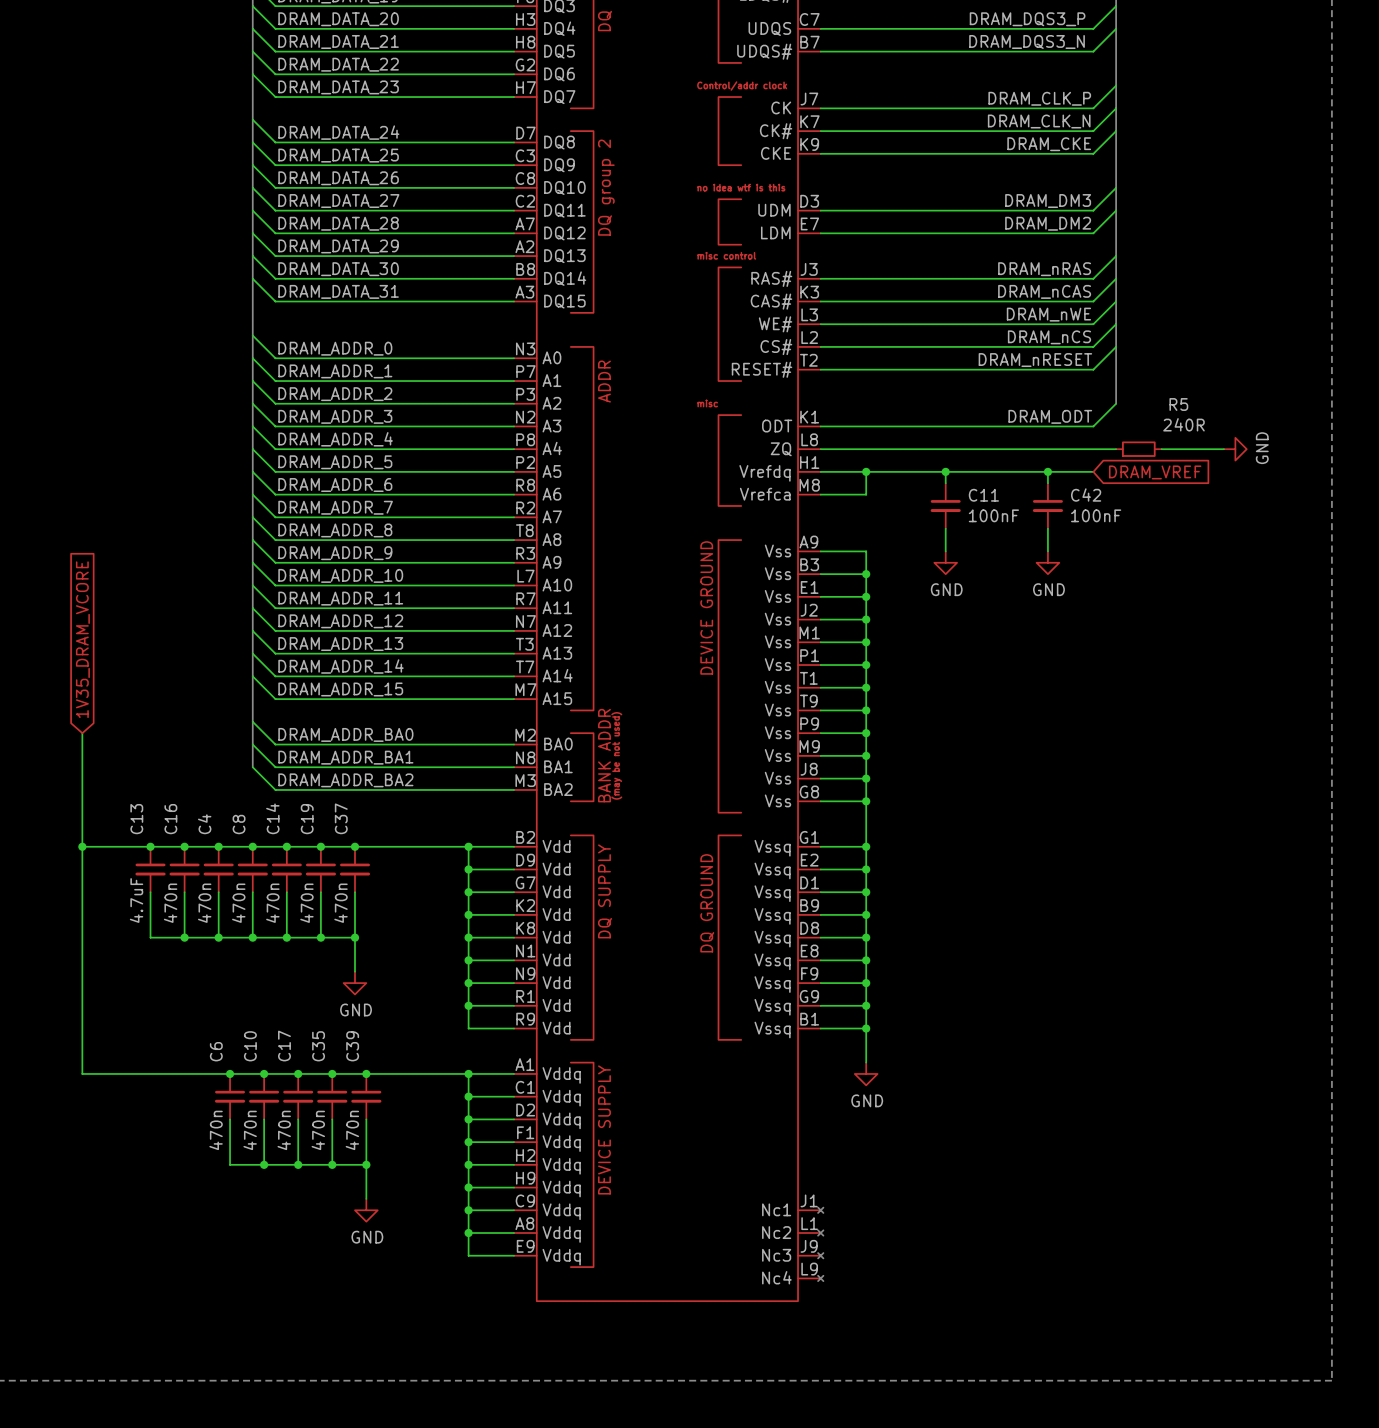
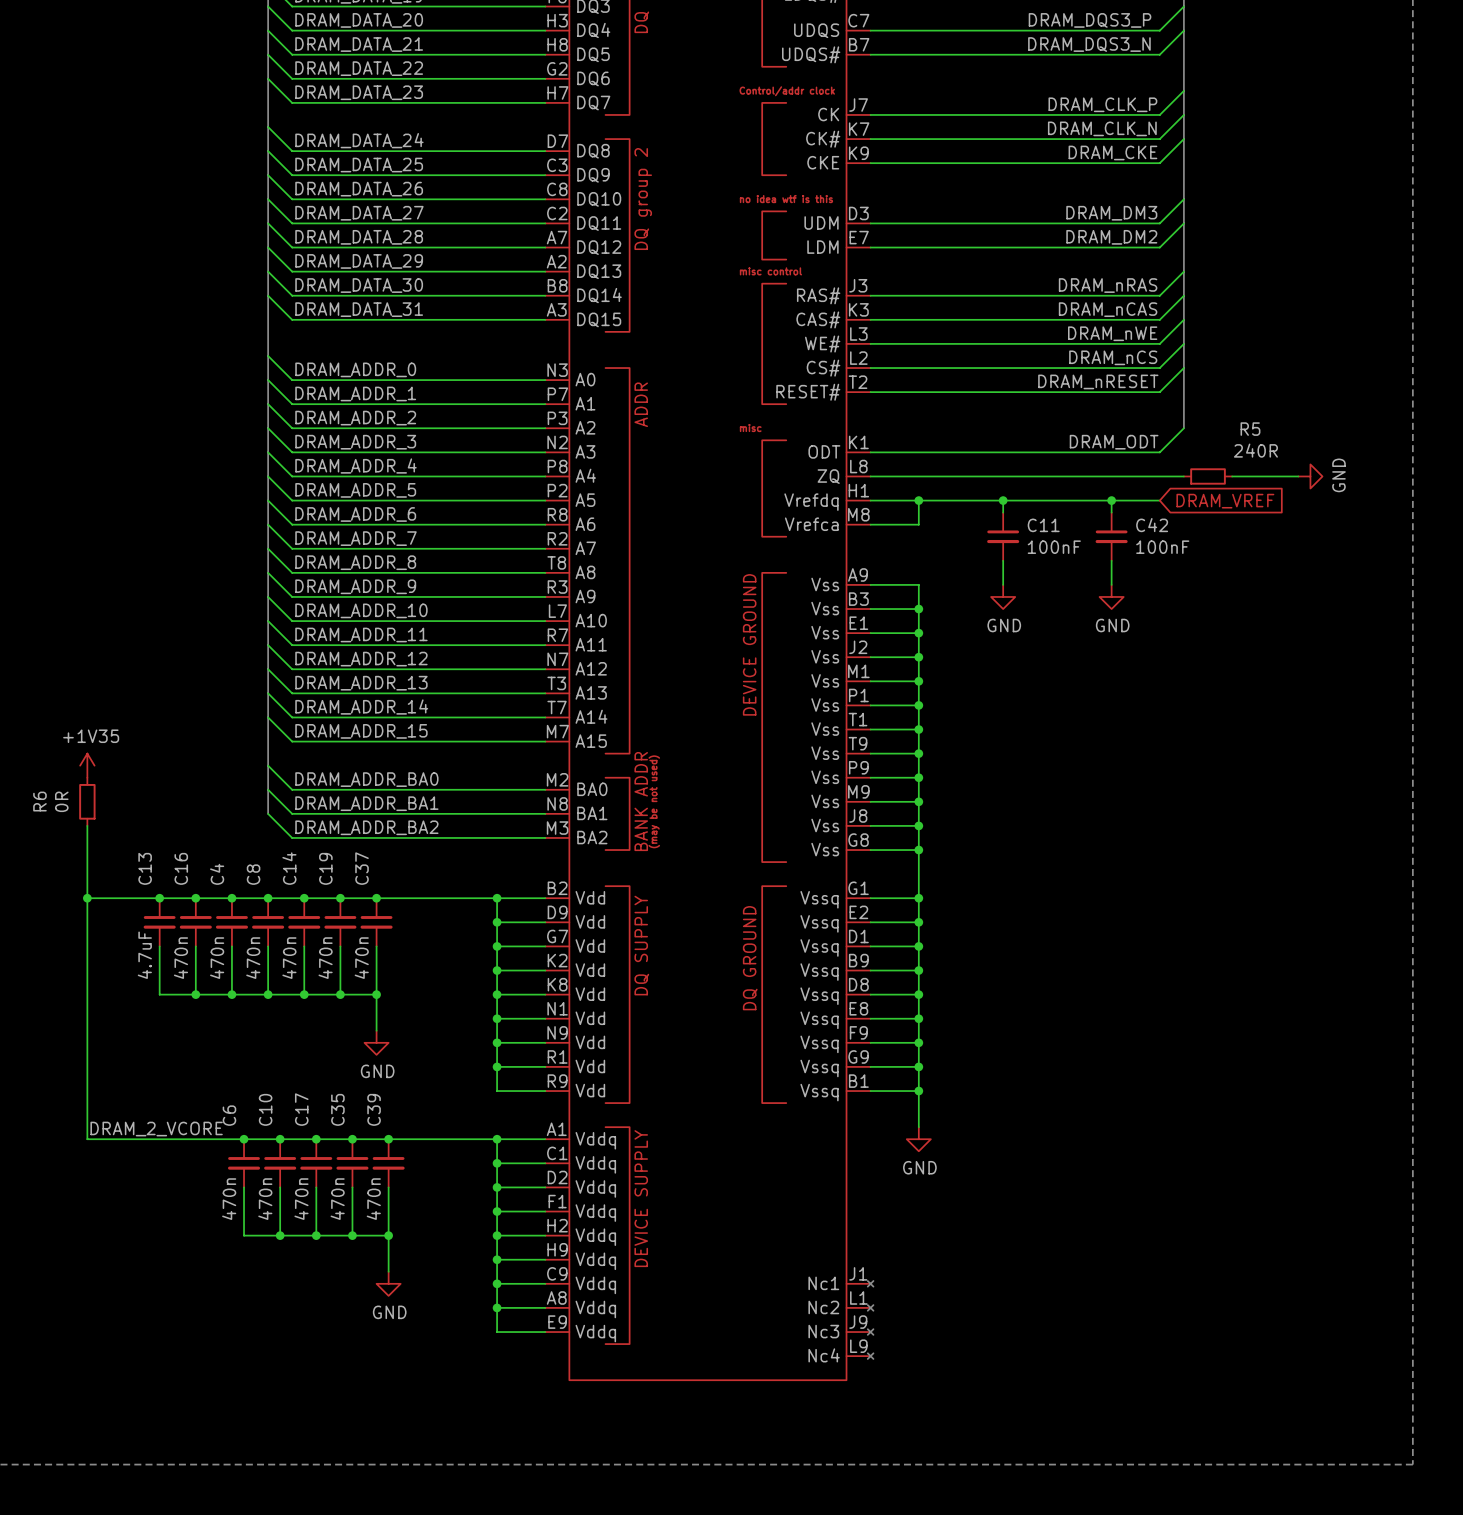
global label: 1V35_DRAM_VCORE (82, 639) -> none
power symbol: none -> +1V35 (87, 765)
wire: (82, 733) (82, 778) -> none
R6: none -> 0R (87, 801)
label: none -> DRAM_2_VCORE (156, 1129)

